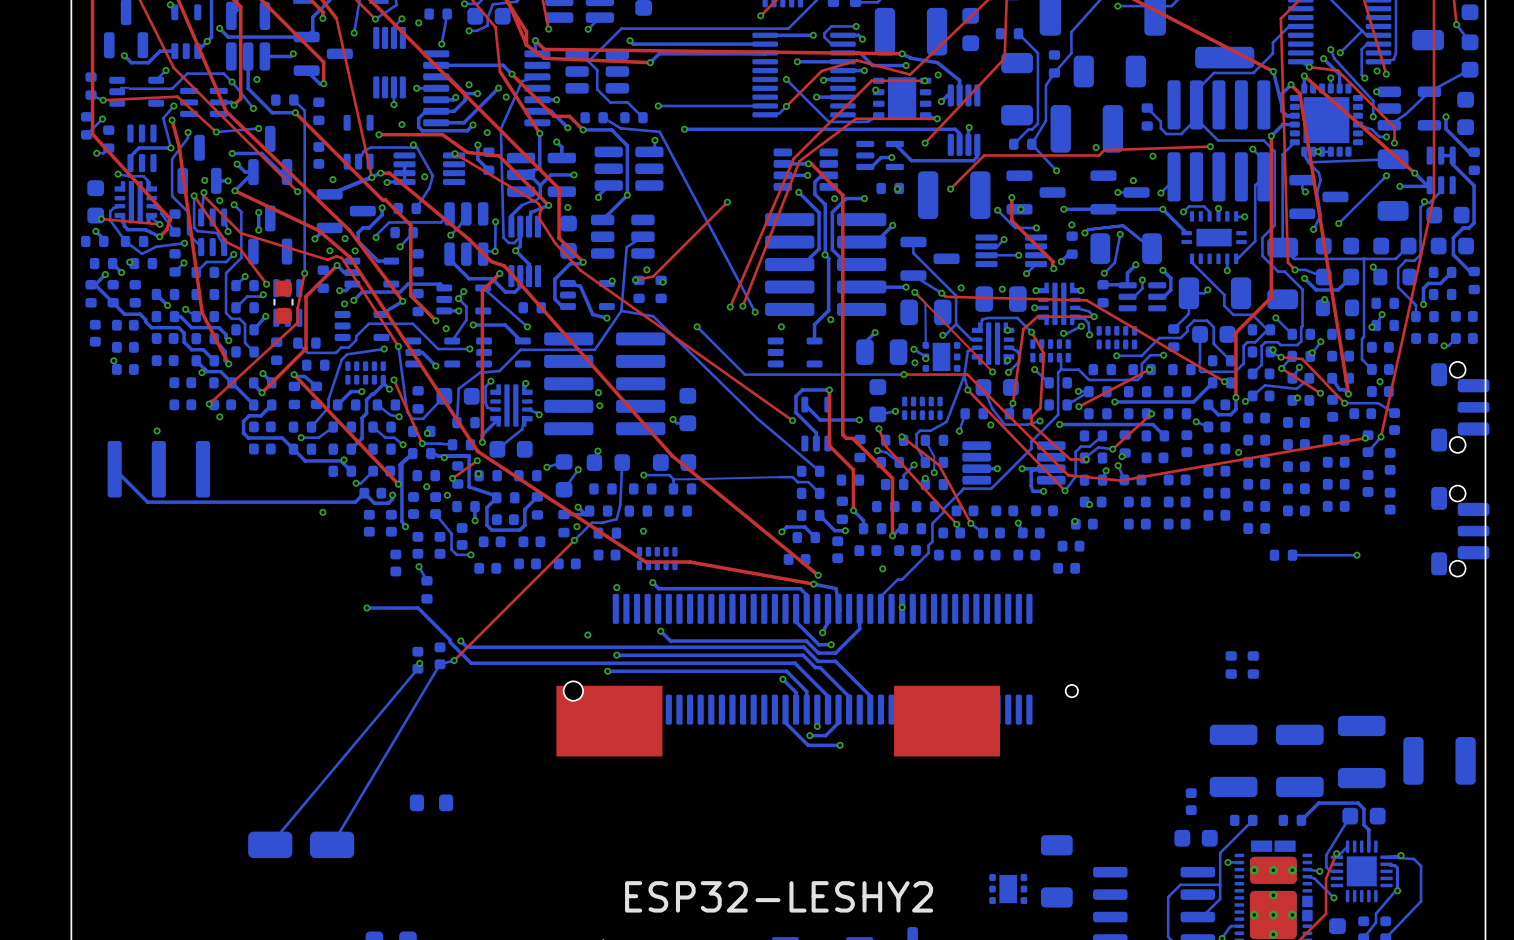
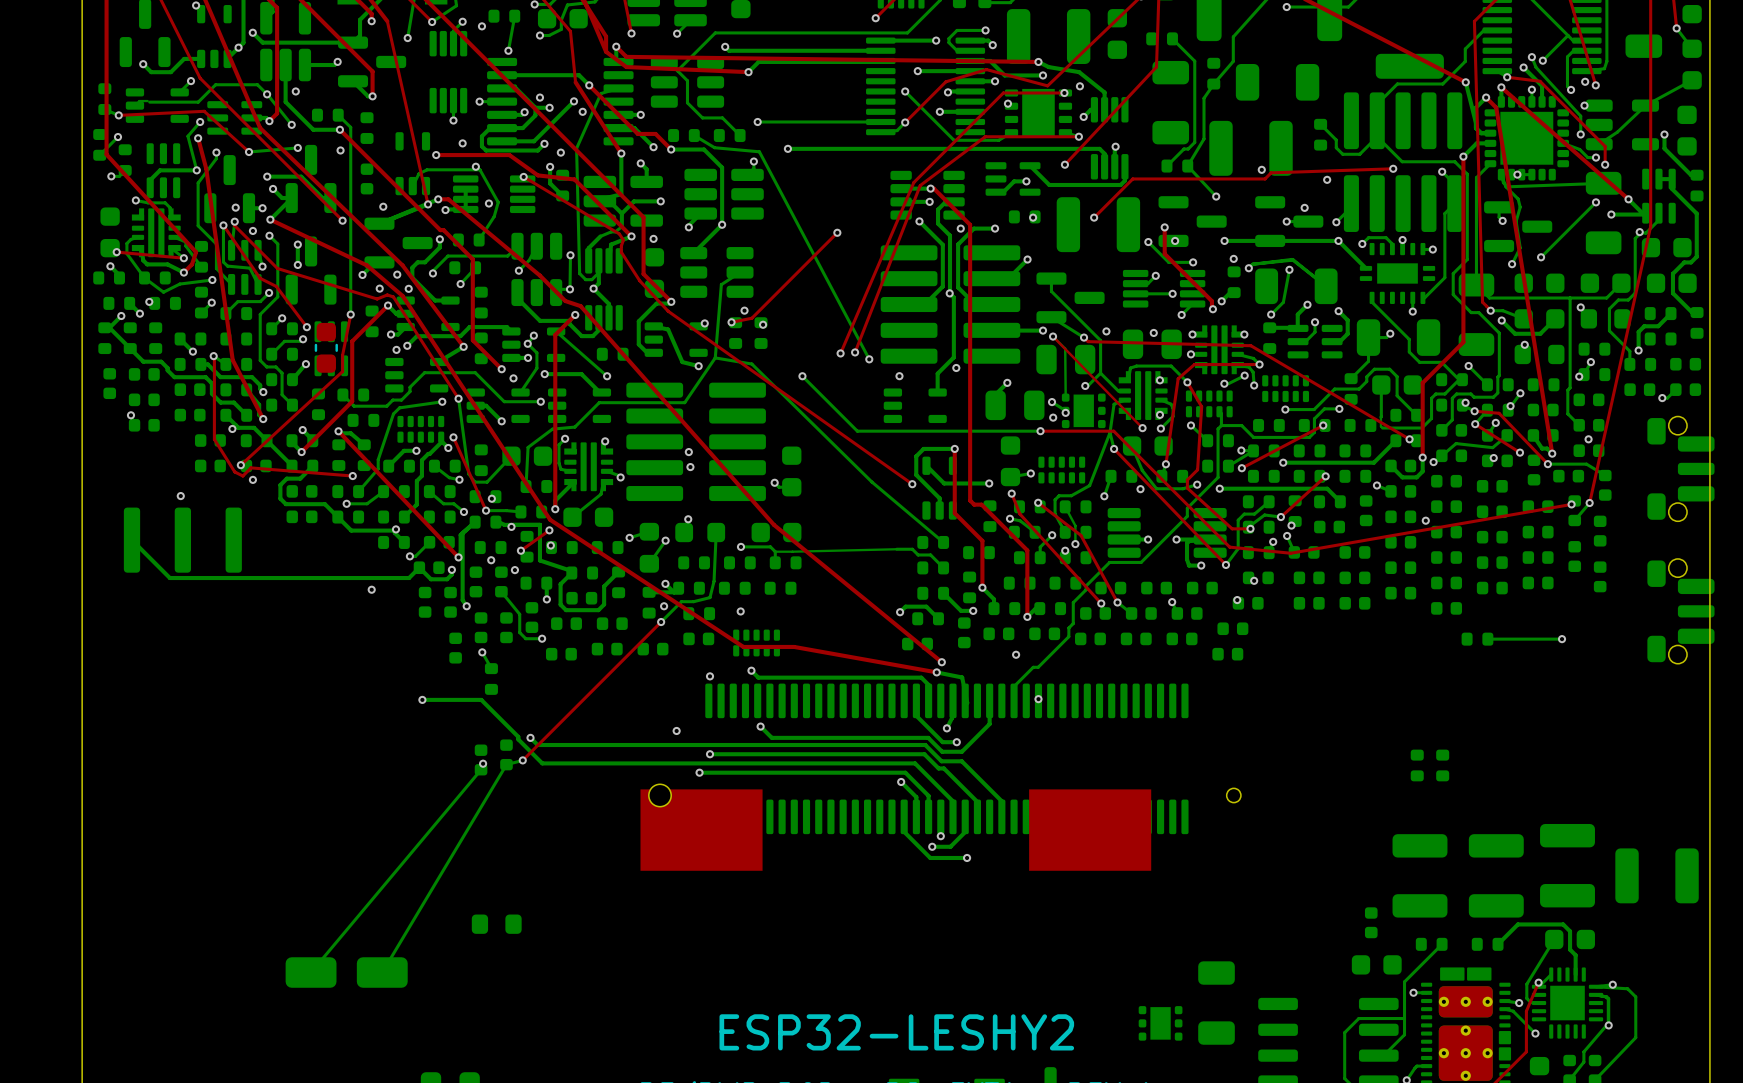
via: none -> (340, 150)
top track: none -> (213, 356) (214, 353) (214, 439) (234, 471) (242, 476) (251, 467) (352, 476)
via: none -> (352, 476)

